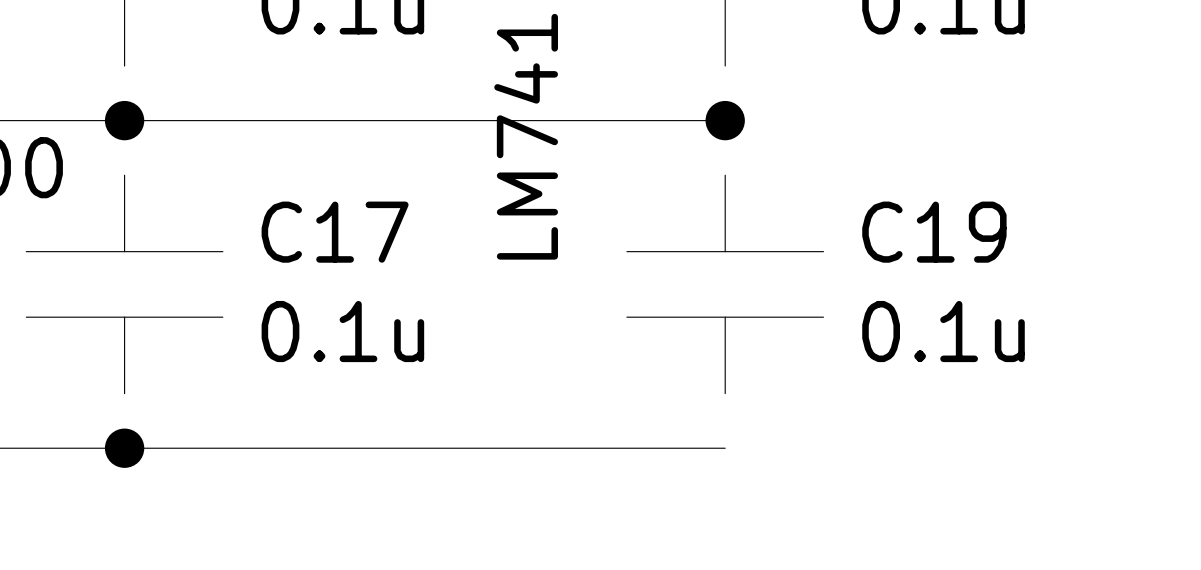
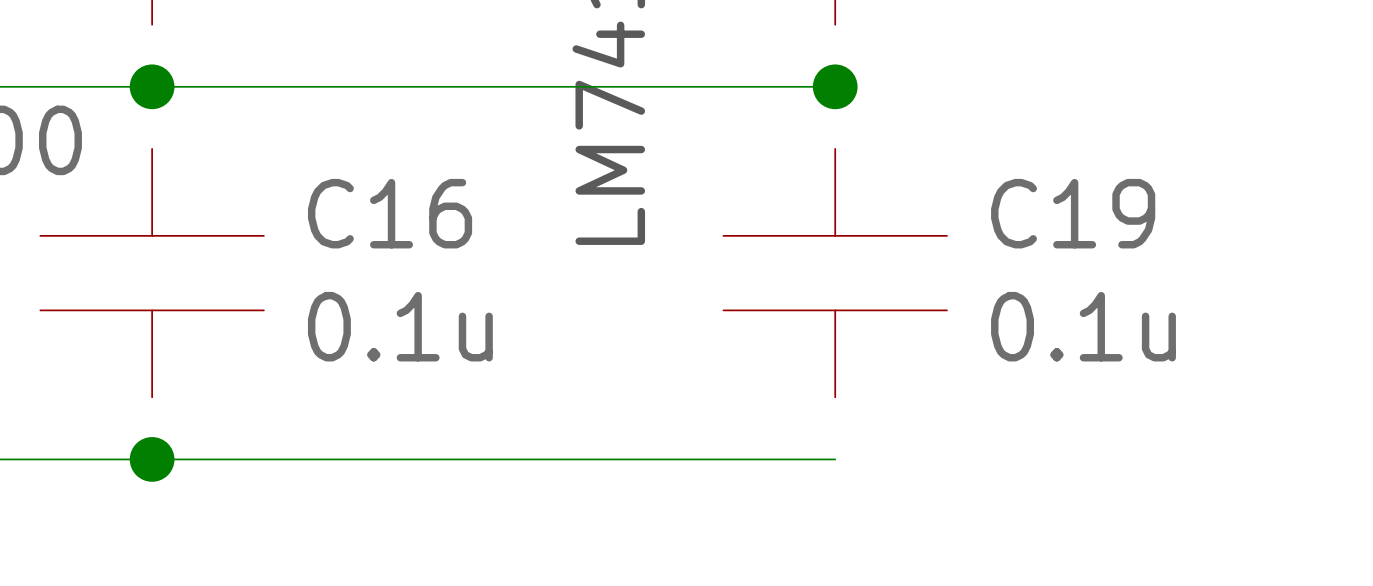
C17 name: C17 (335, 232) -> C16 (390, 213)

